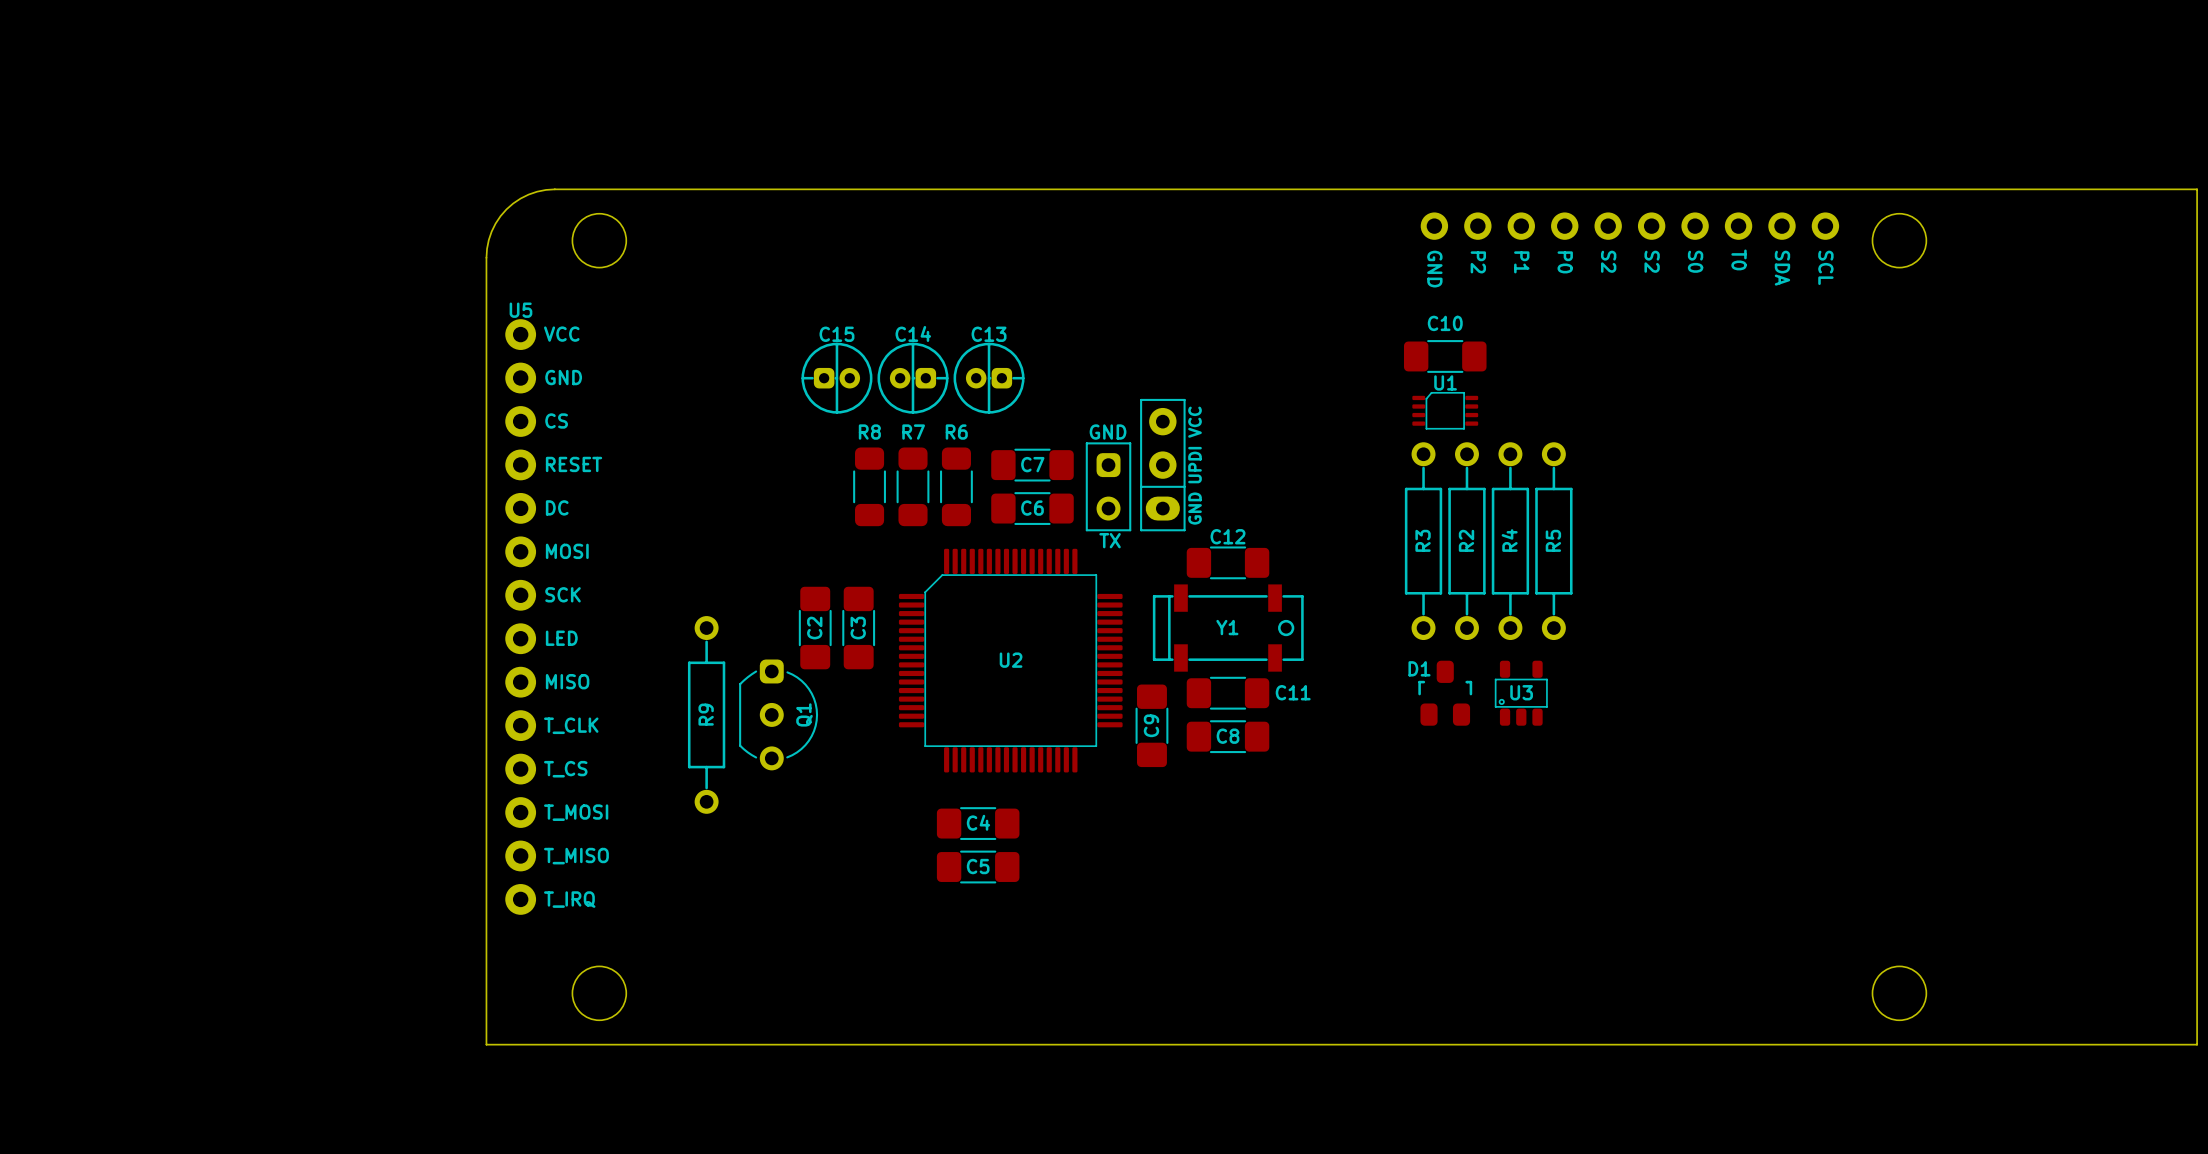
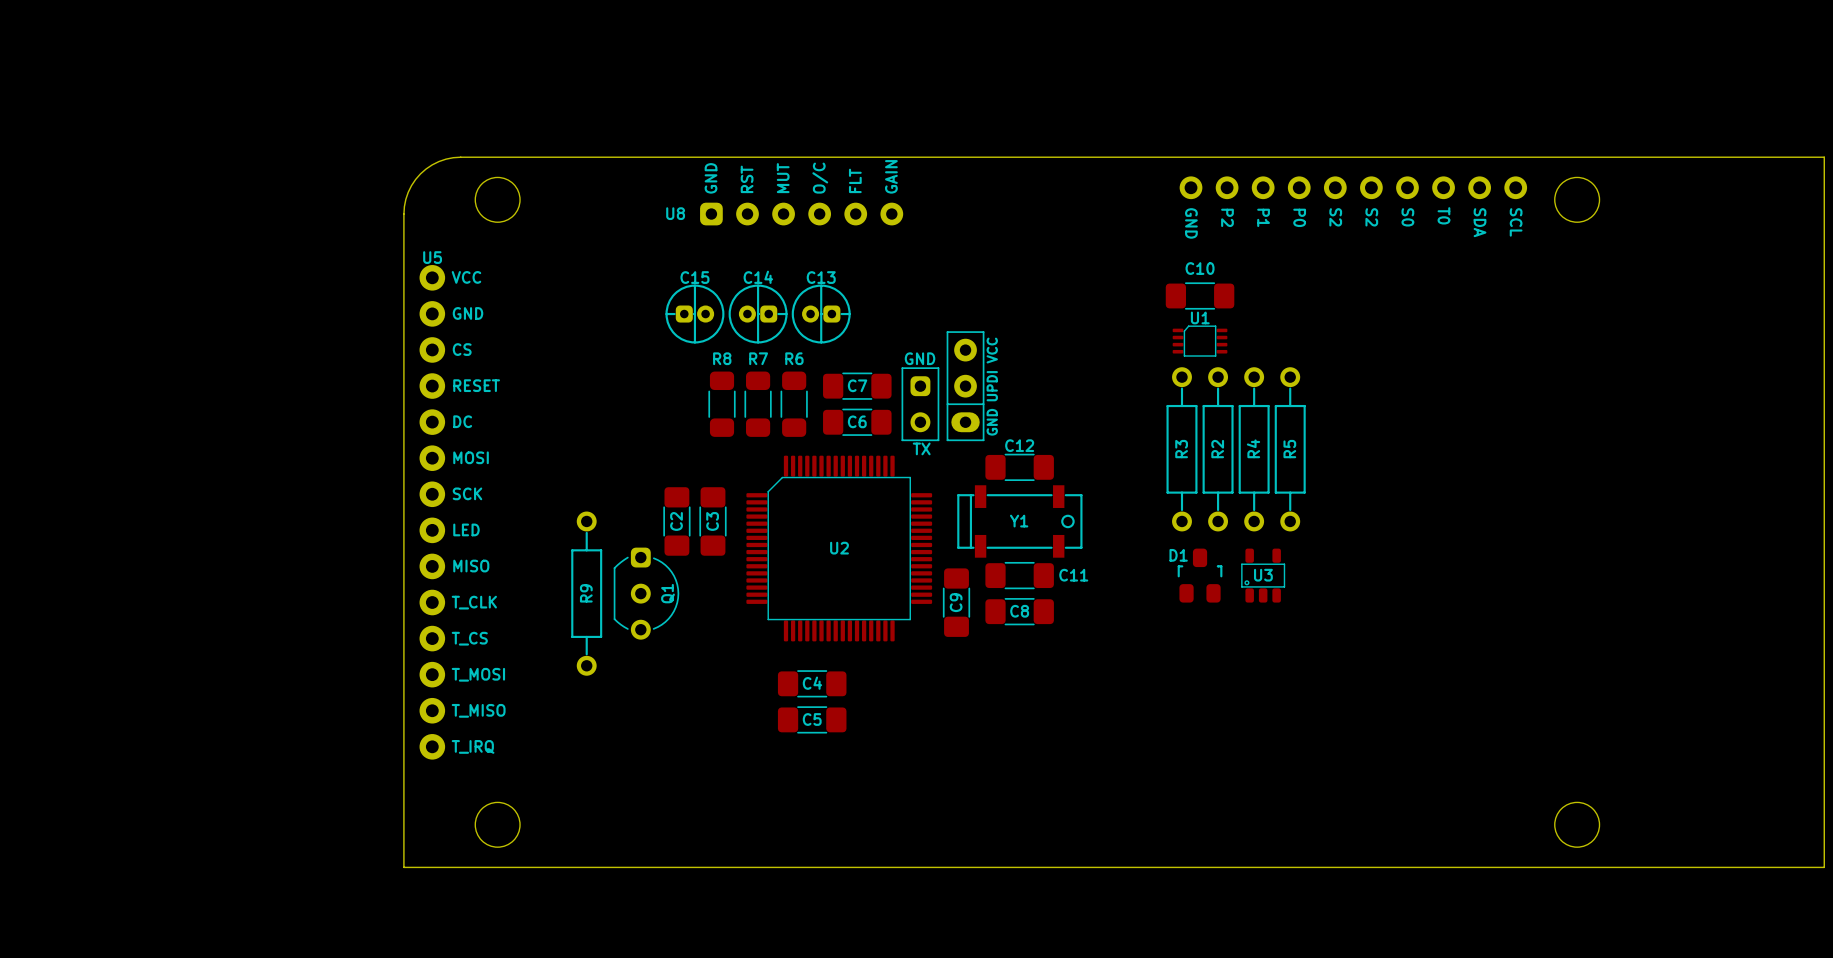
U8: none -> (801, 214)

